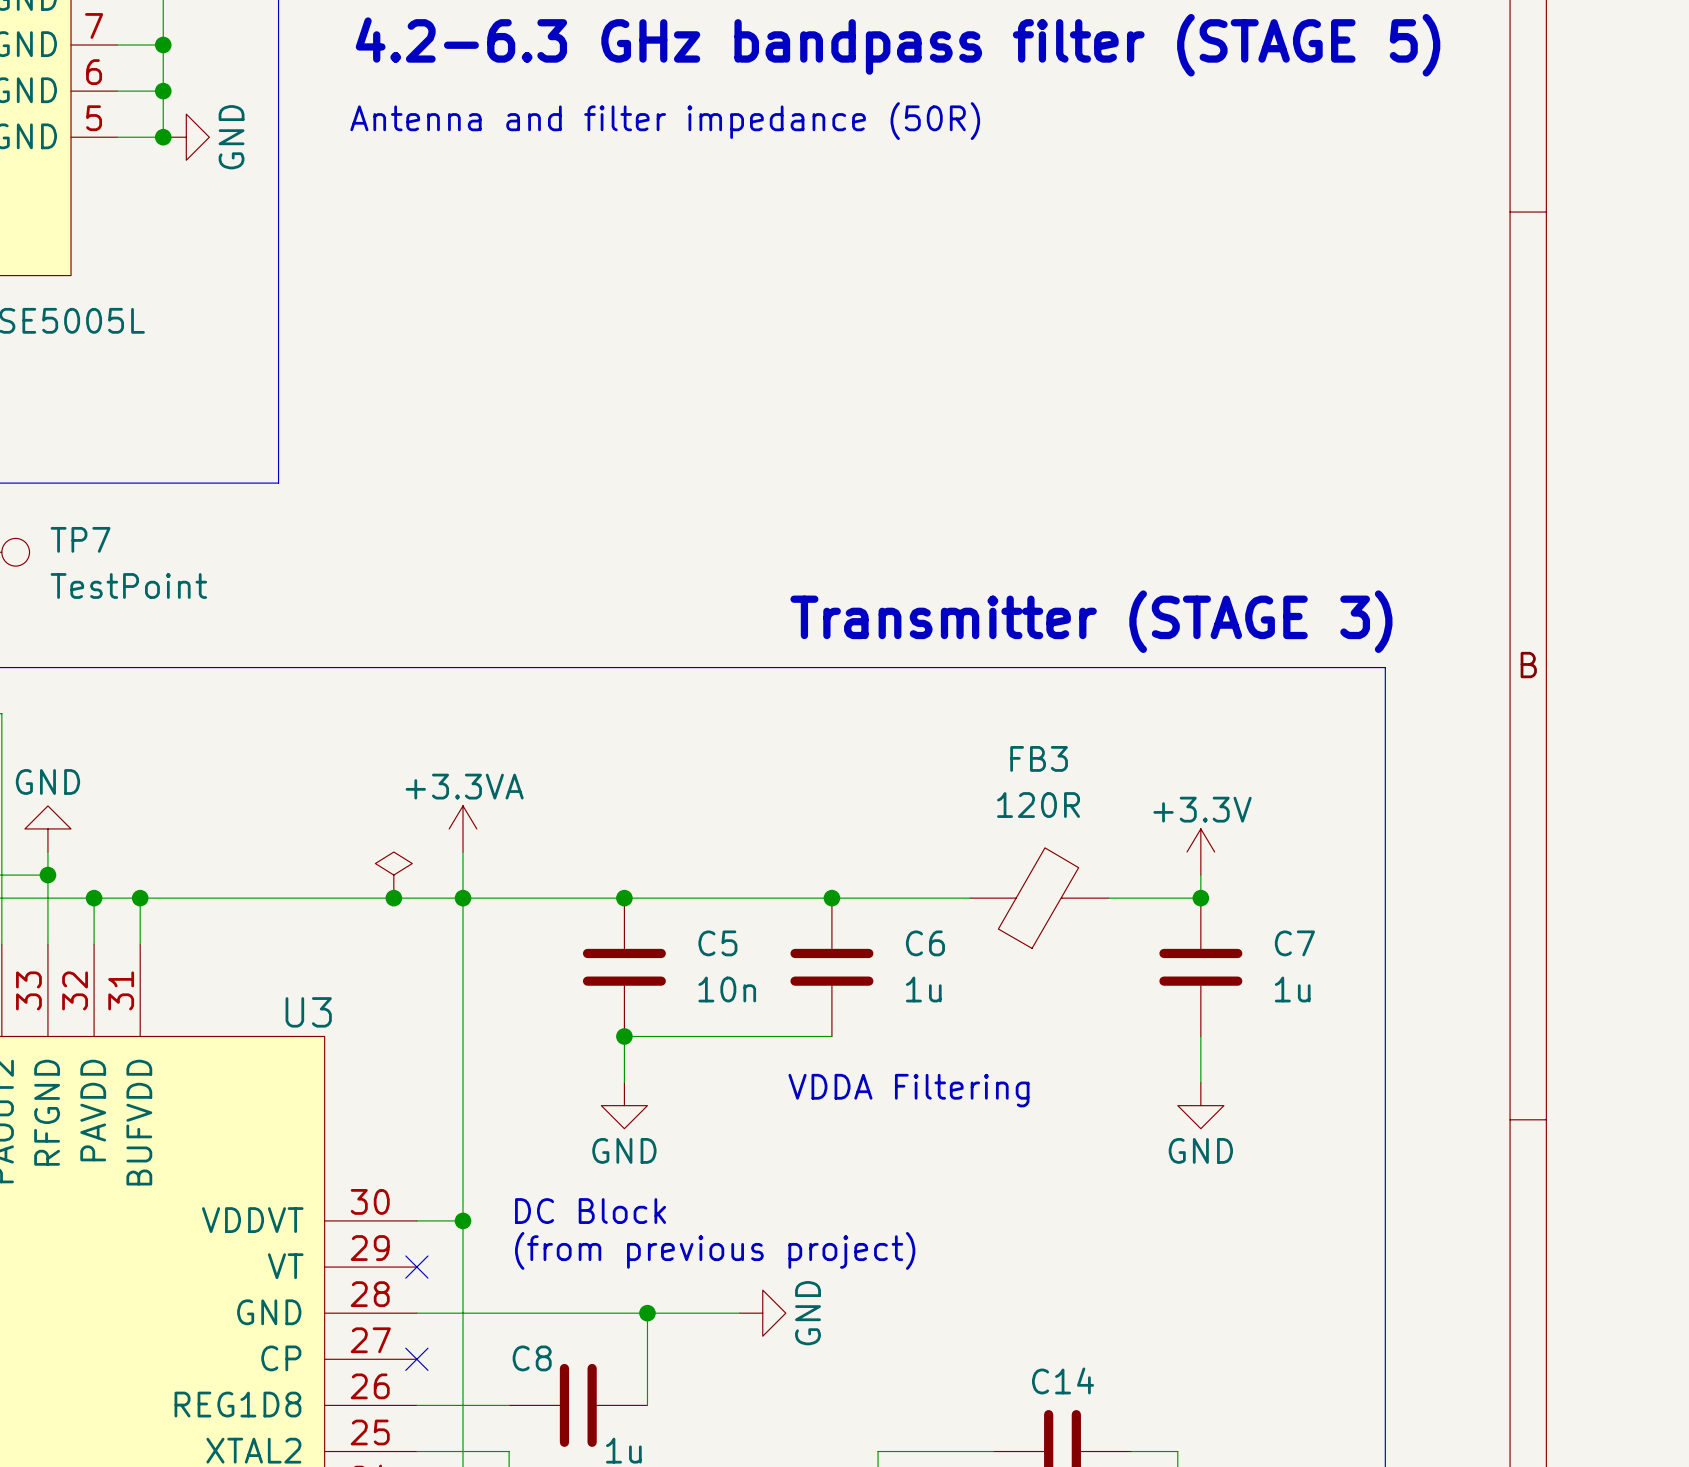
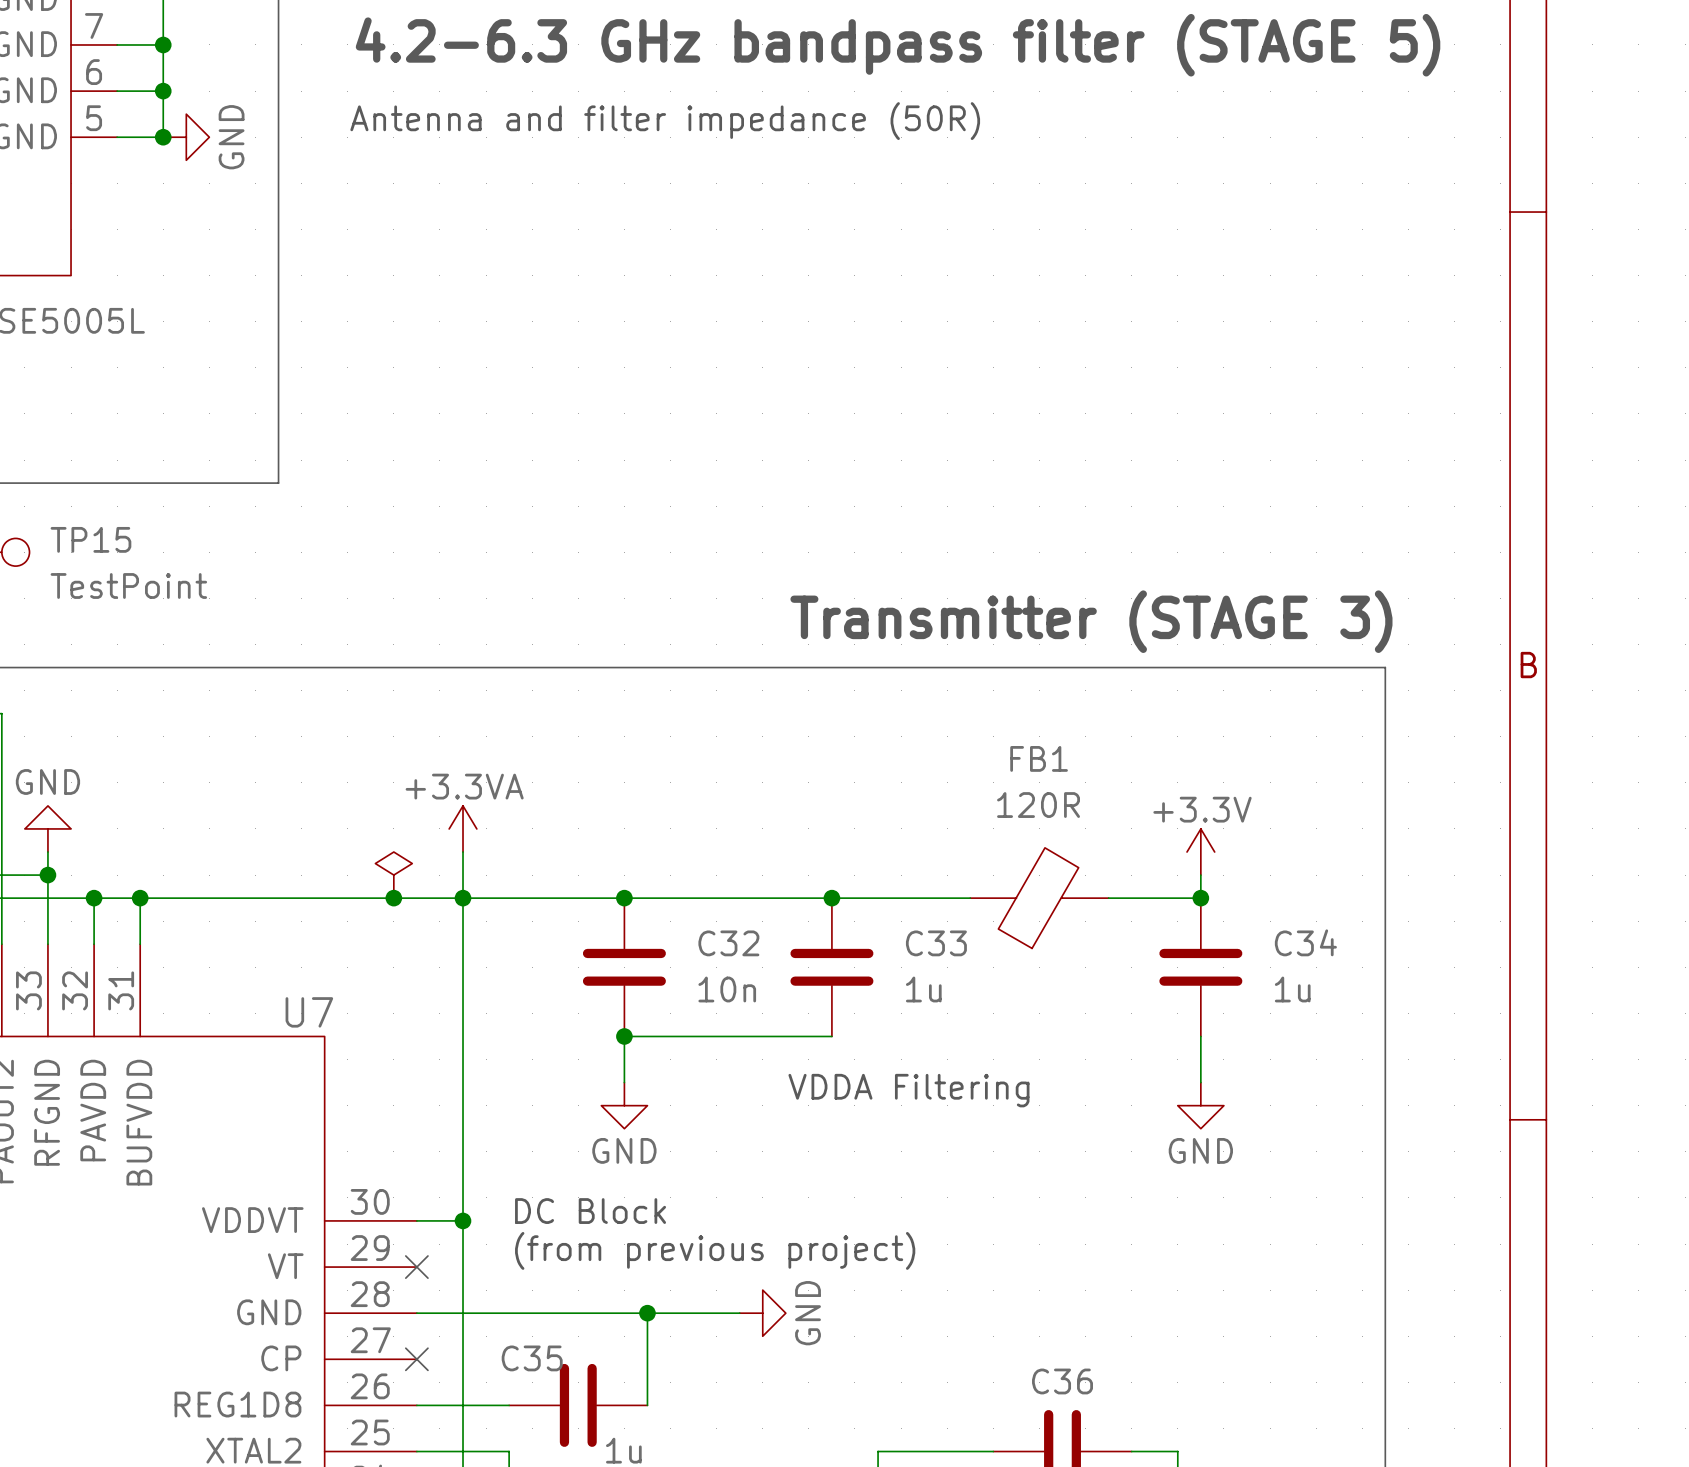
TP7 name: TP7 (80, 539) -> TP15 (90, 539)
FB3 name: FB3 (1039, 758) -> FB1 (1039, 758)
C5 name: C5 (717, 943) -> C32 (728, 943)
C6 name: C6 (925, 943) -> C33 (936, 943)
C7 name: C7 (1294, 943) -> C34 (1305, 942)
U3 name: U3 (308, 1012) -> U7 (309, 1012)
C8 name: C8 (532, 1358) -> C35 (532, 1358)
C14 name: C14 (1063, 1380) -> C36 (1062, 1381)

